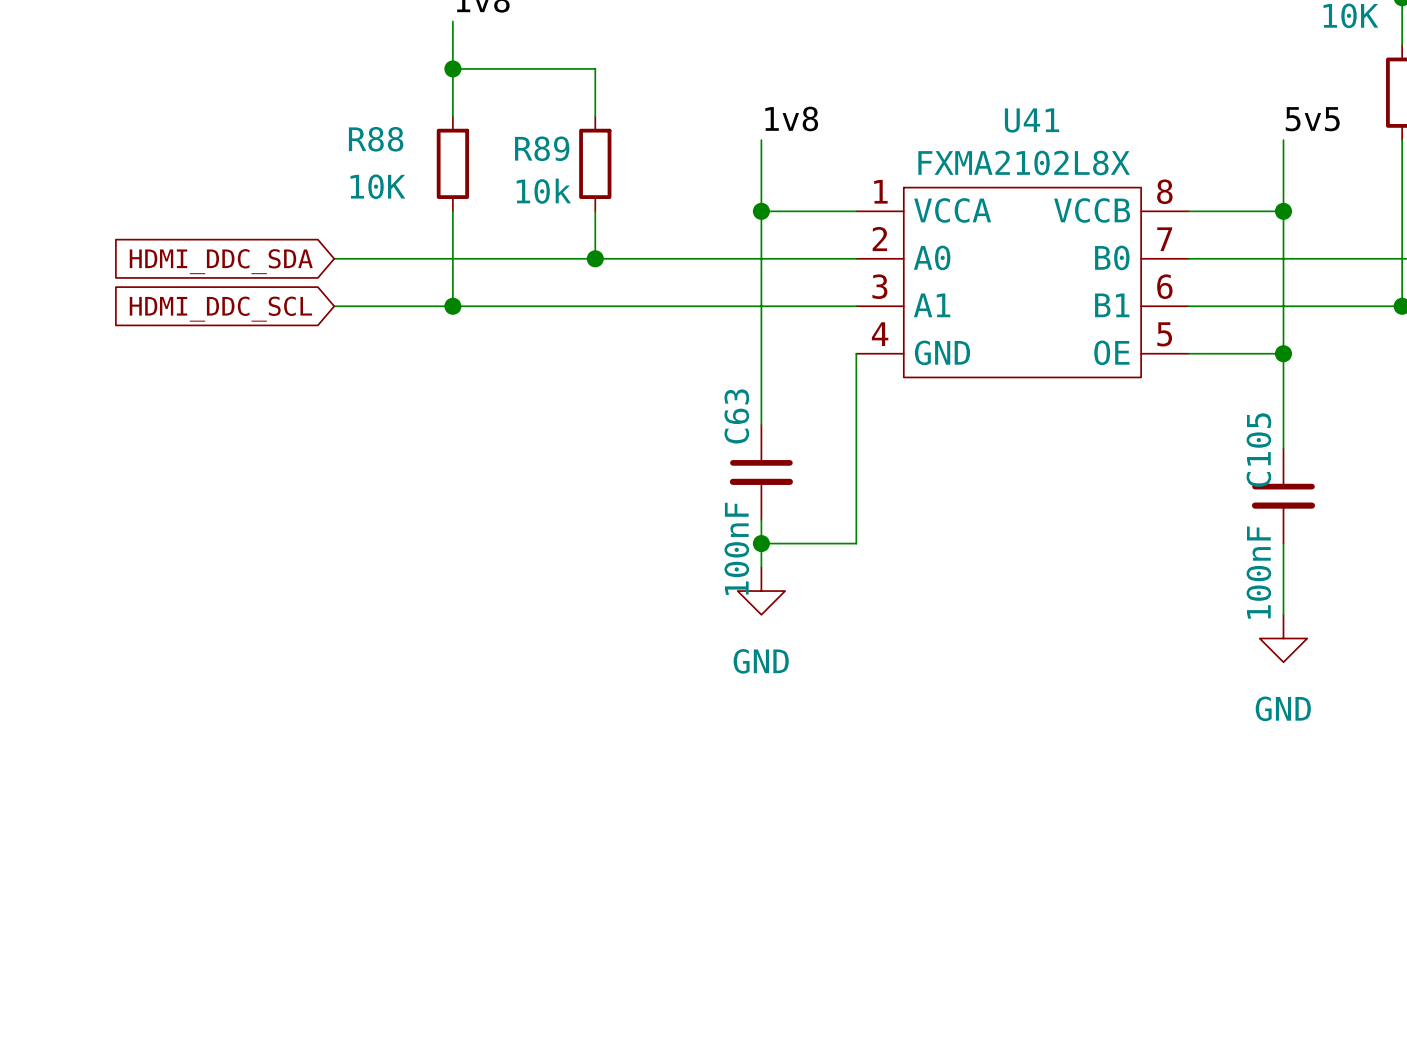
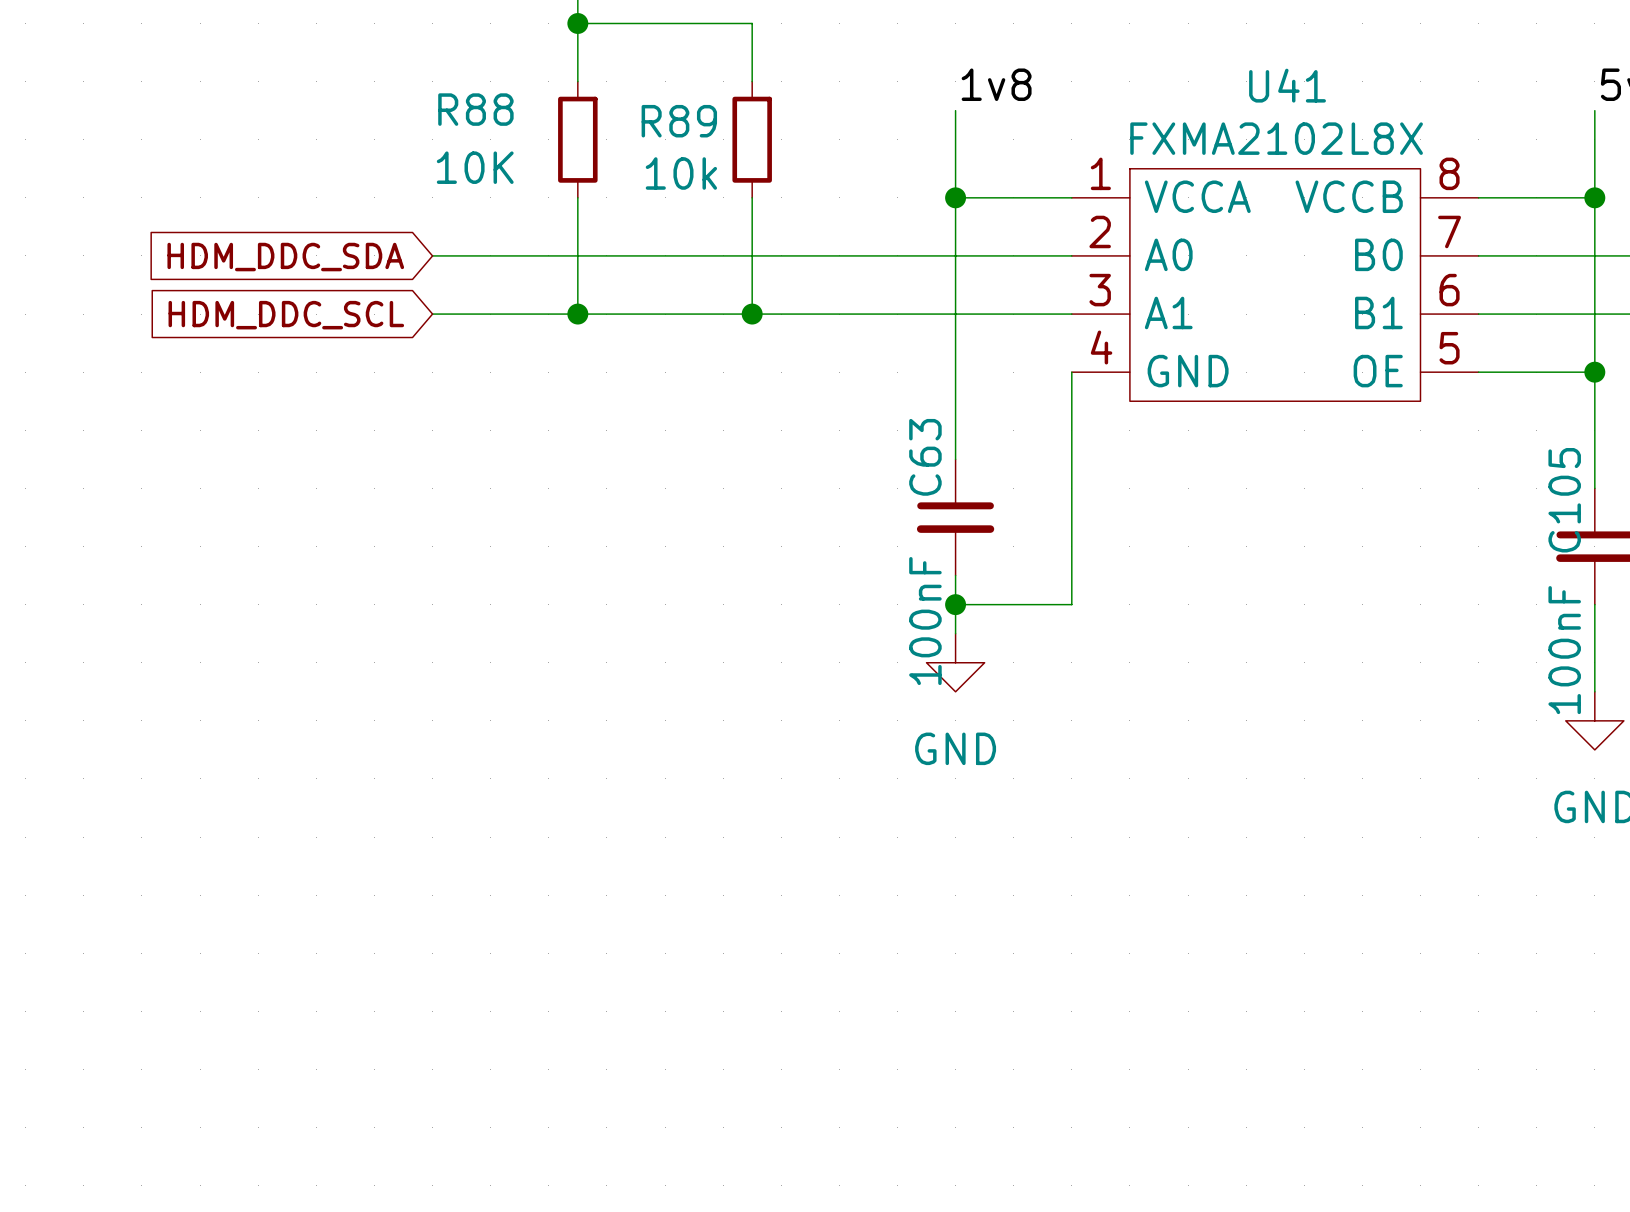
wire: none -> (752, 255) (752, 314)
junction position: (595, 258) -> (752, 314)
global label: HDMI_DDC_SDA (221, 261) -> HDM_DDC_SDA (285, 257)
global label: HDMI_DDC_SCL (220, 309) -> HDM_DDC_SCL (286, 315)

